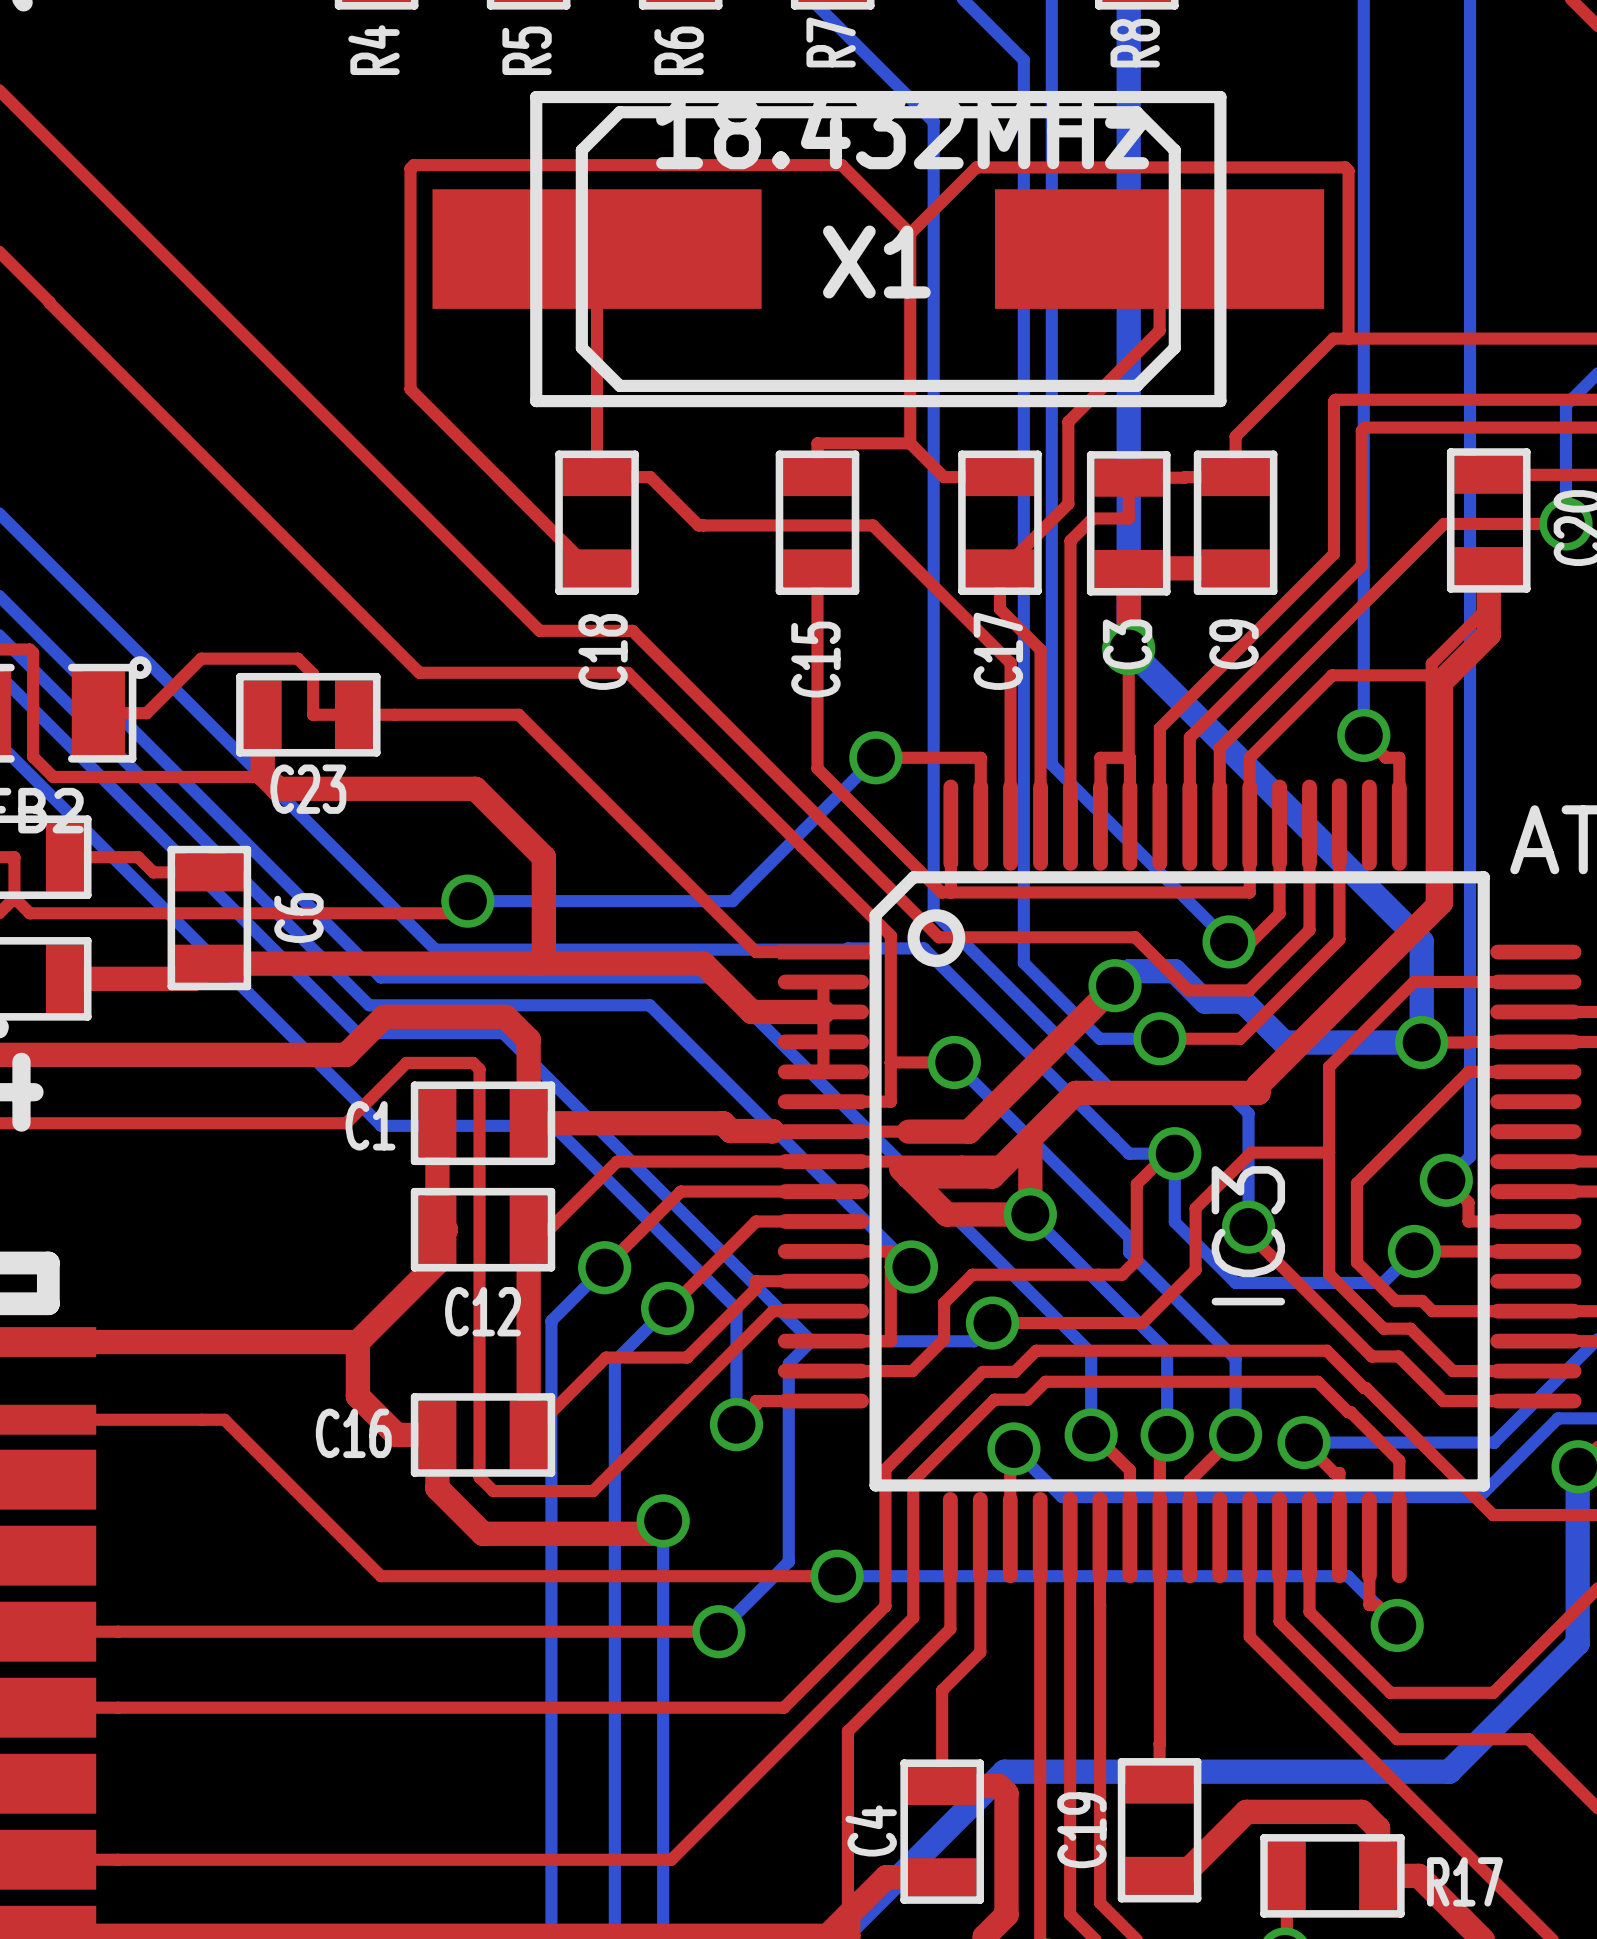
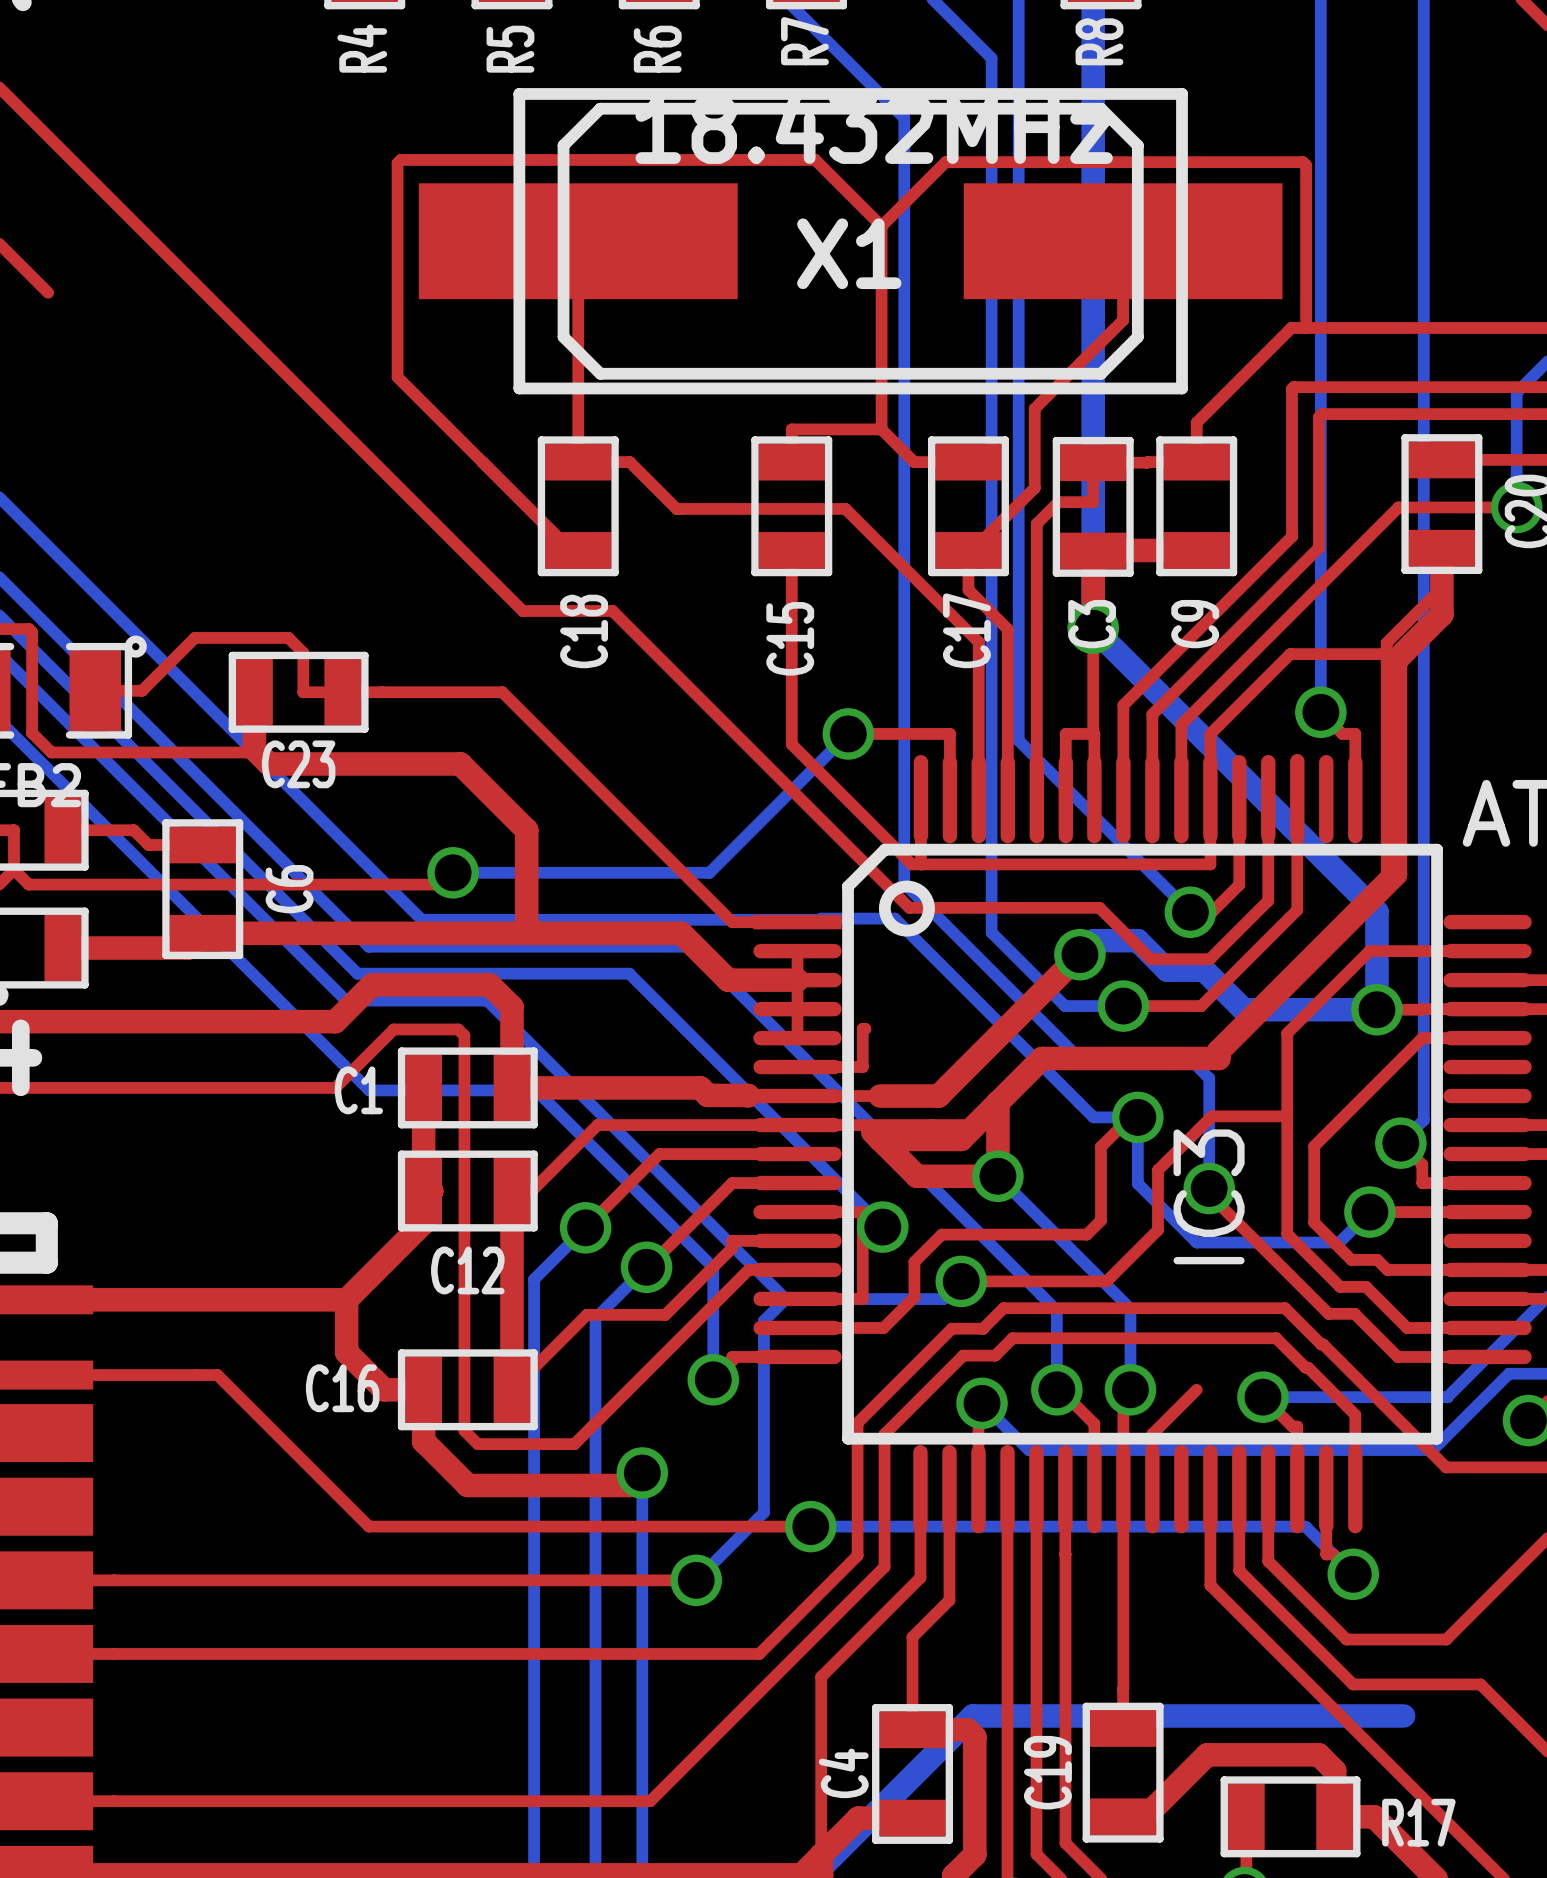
top track: (49, 303) (419, 672) (627, 672) (890, 935) (890, 1062) -> none
top track: (893, 1062) (954, 1062) -> none
bottom track: (954, 1062) (1129, 1237) (1129, 1252) (1235, 1358) (1235, 1434) -> none
via: (954, 1062) -> none
via: (1235, 1434) -> none
bottom track: (1578, 1466) (1578, 1642) (1449, 1771) (1577, 1643) (1577, 1467) -> none

